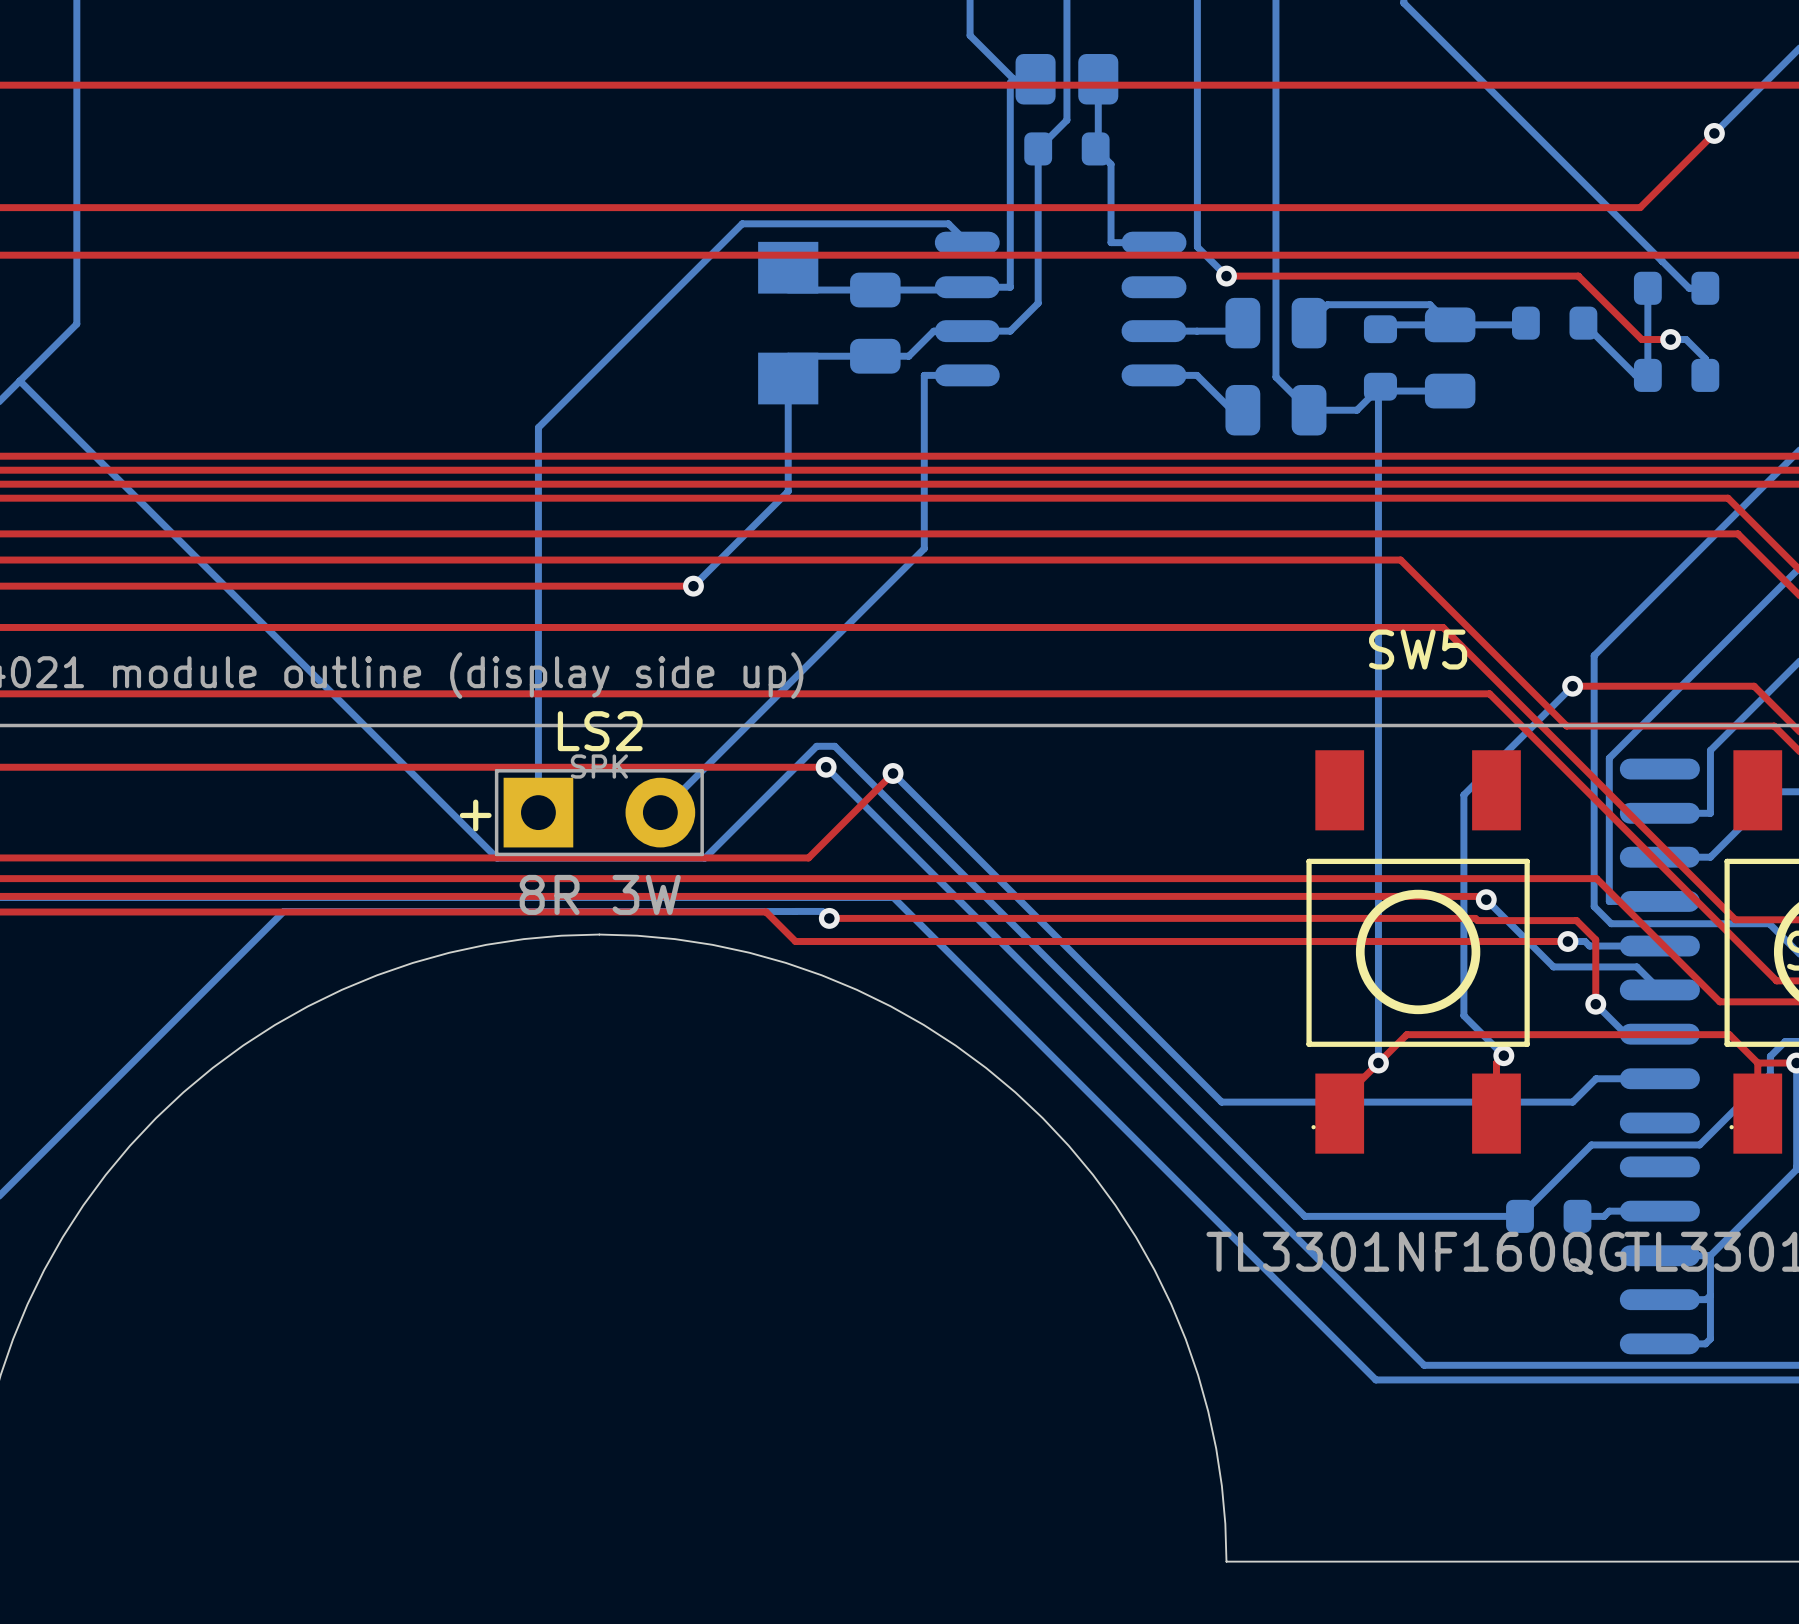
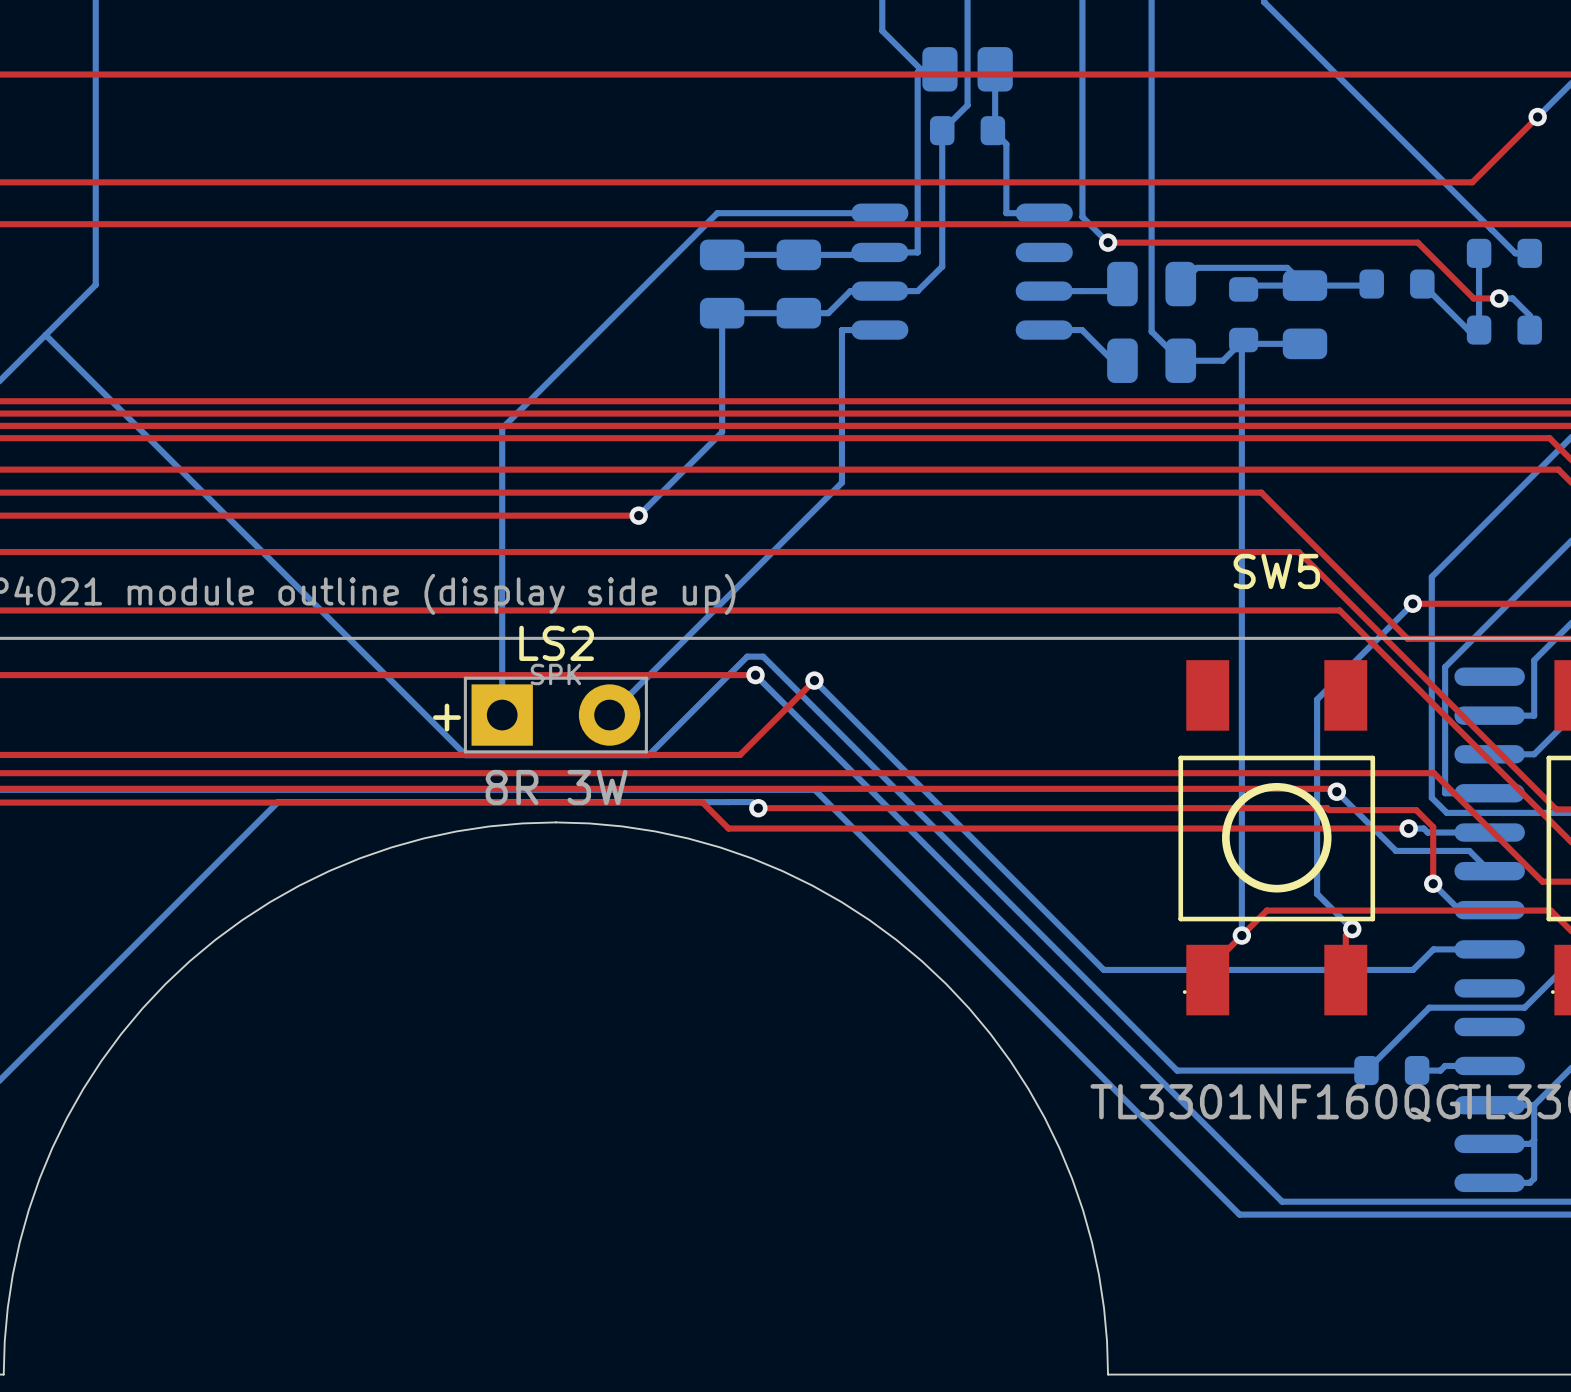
part footprint: [758, 241, 819, 405] -> [699, 239, 745, 329]
bottom track: (967, 242) (948, 223) (742, 223) (538, 427) (538, 486) -> (879, 213) (717, 213) (502, 428)

